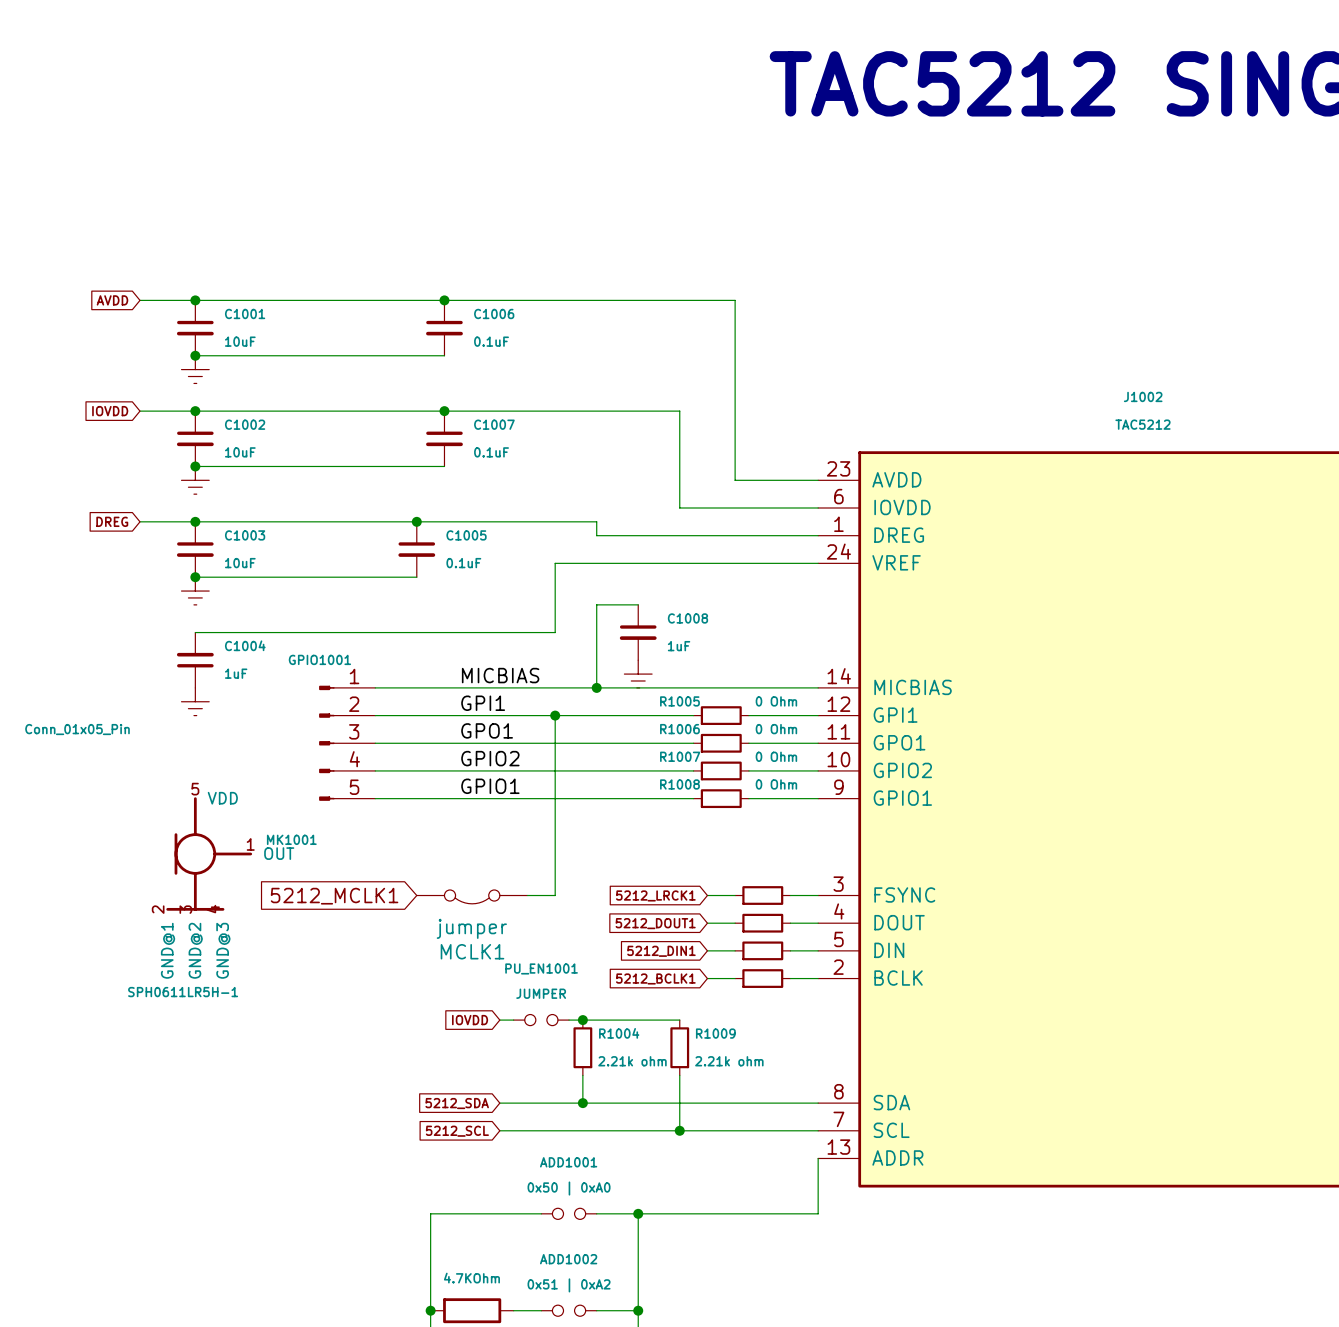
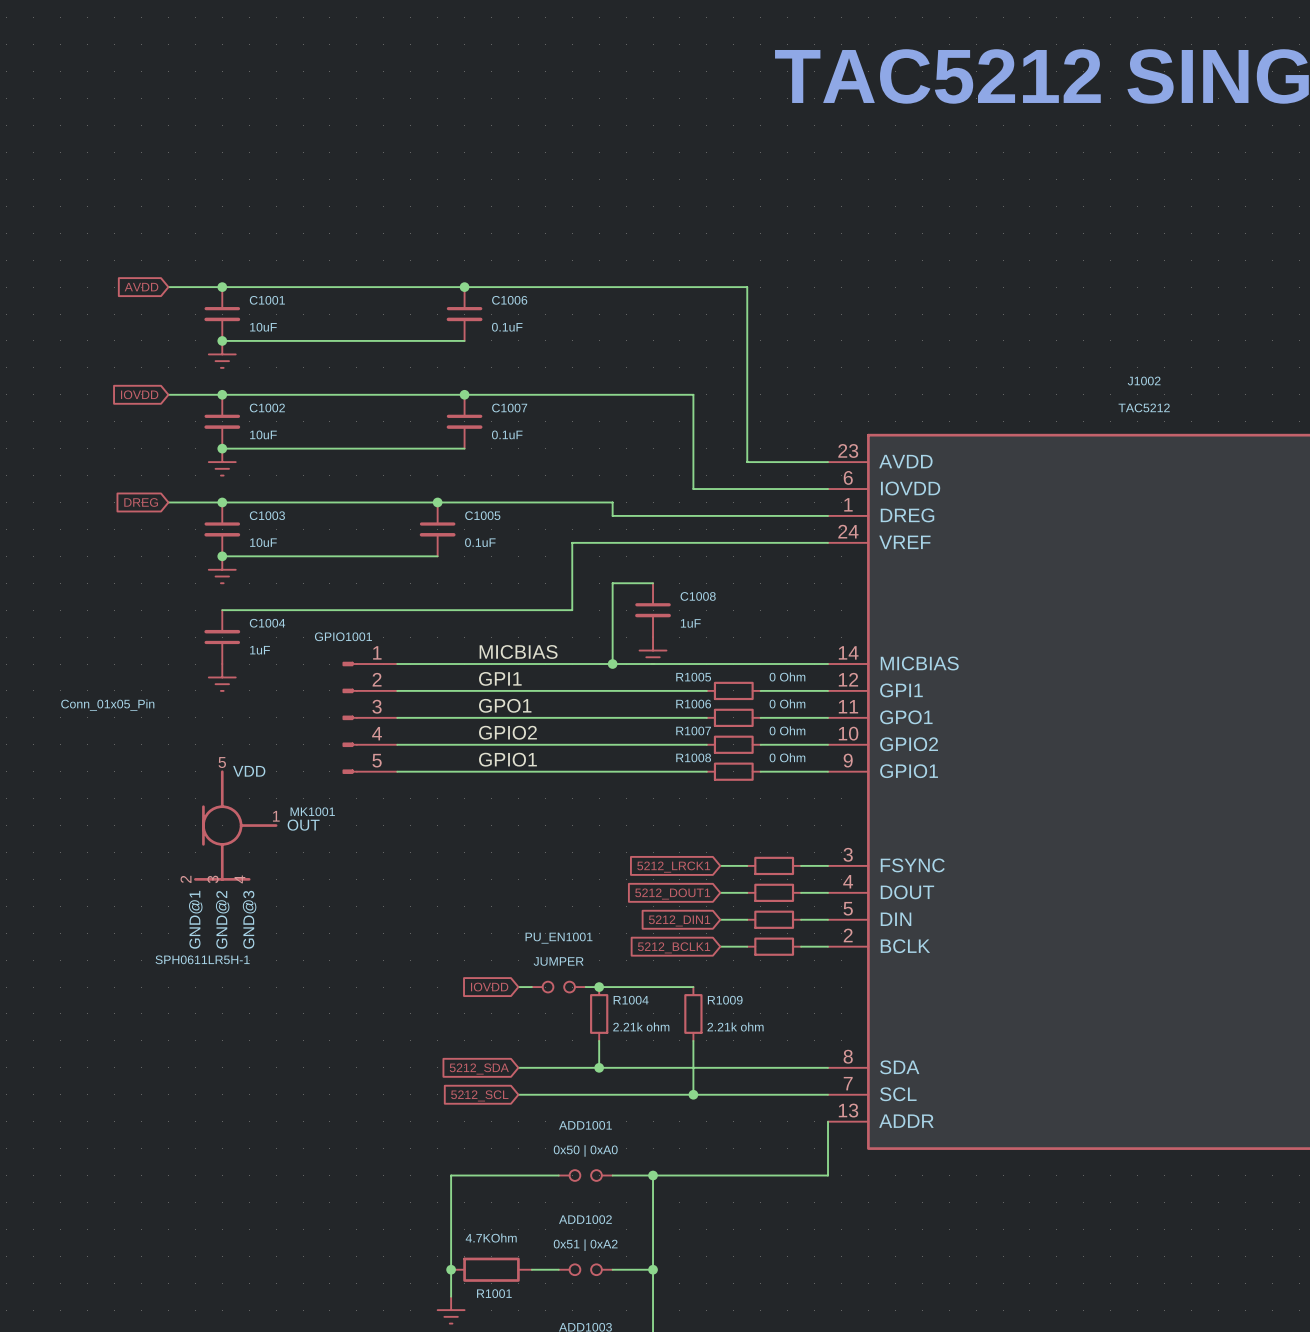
wire: (555, 715) (555, 895) (527, 895) -> none
junction: (555, 715) -> none
global label: 5212_MCLK1 (334, 896) -> none
MCLK1: jumper (472, 896) -> none

